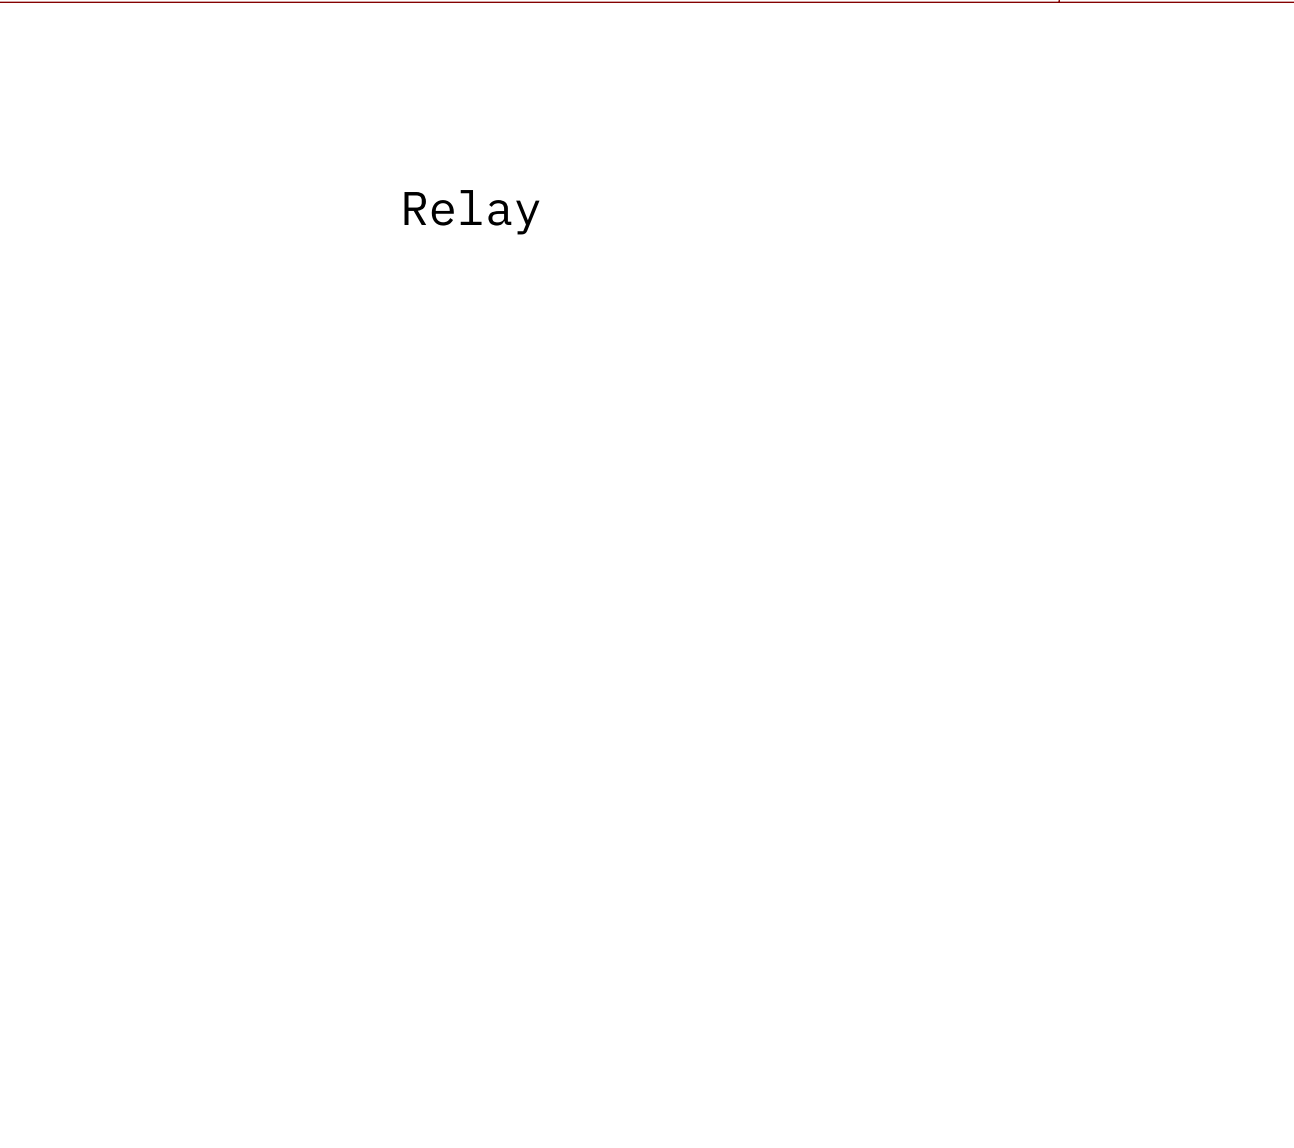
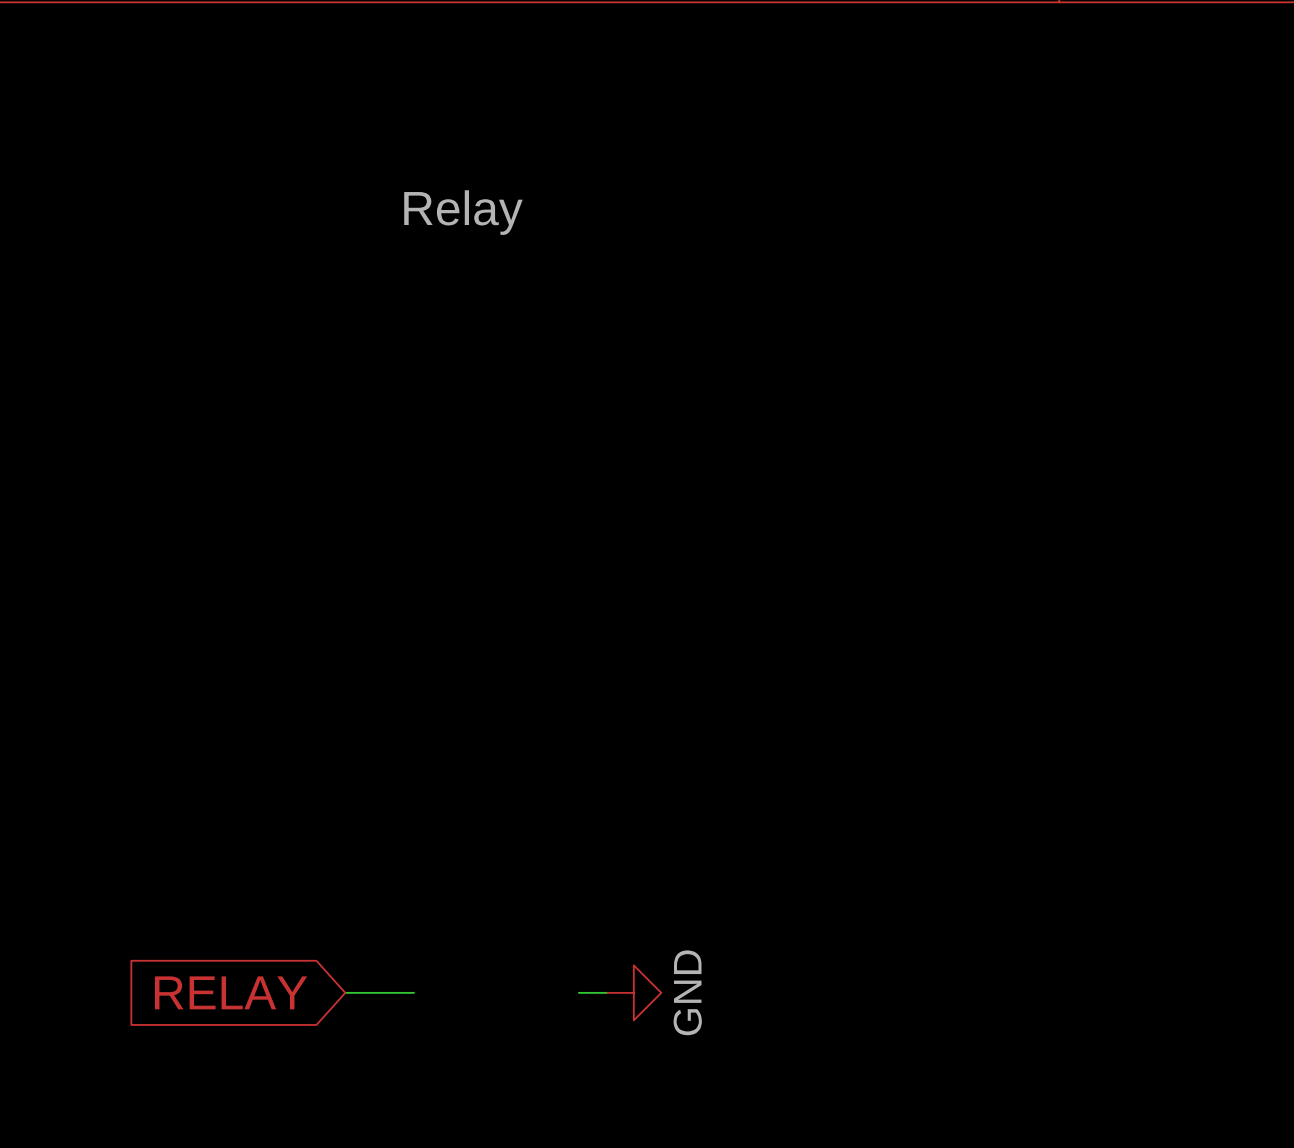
global label: none -> RELAY (231, 992)
wire: none -> (345, 992) (414, 992)
wire: none -> (578, 992) (606, 992)
power symbol: none -> GND (633, 992)

